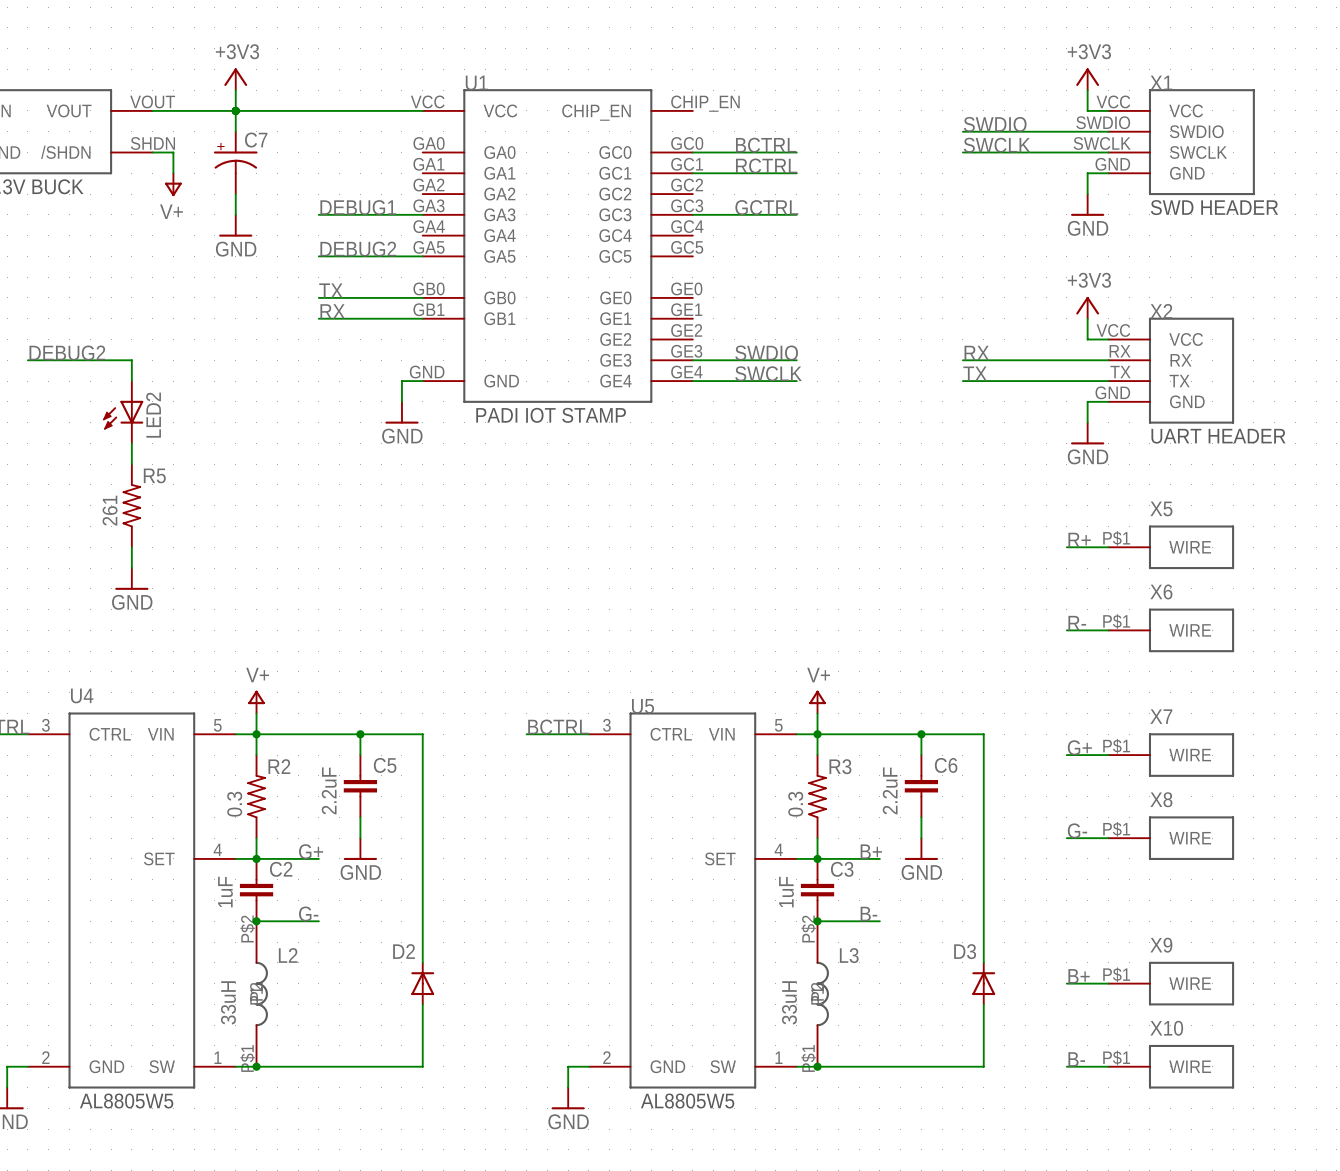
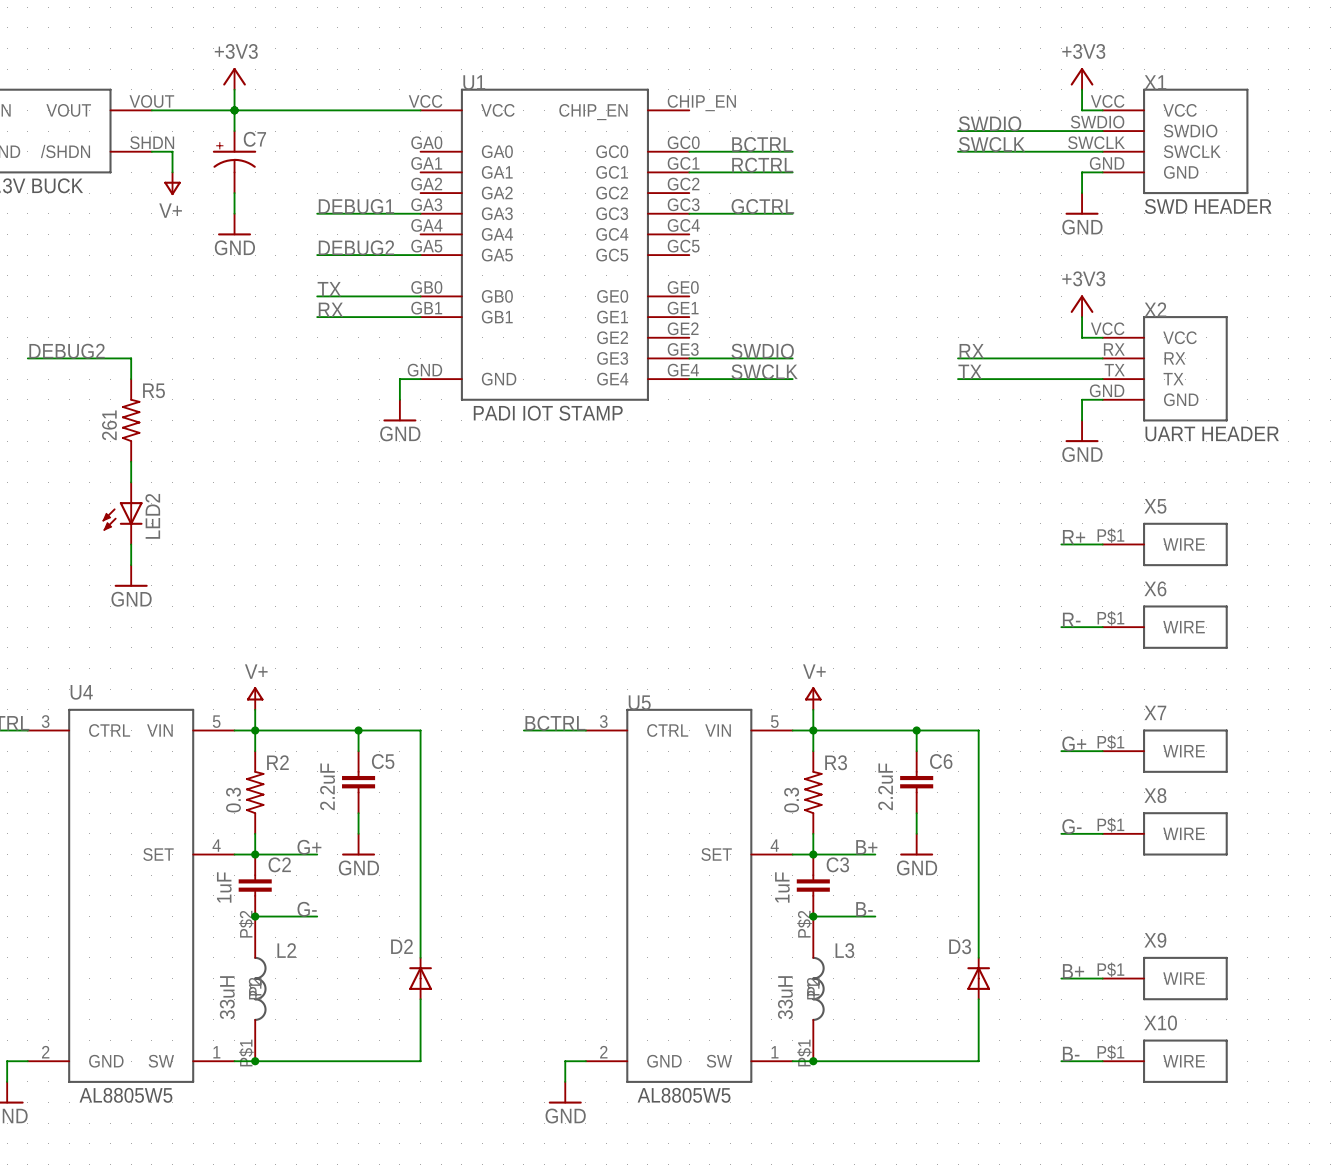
LED2 position: (123, 412) -> (122, 513)
R5 position: (131, 505) -> (131, 420)

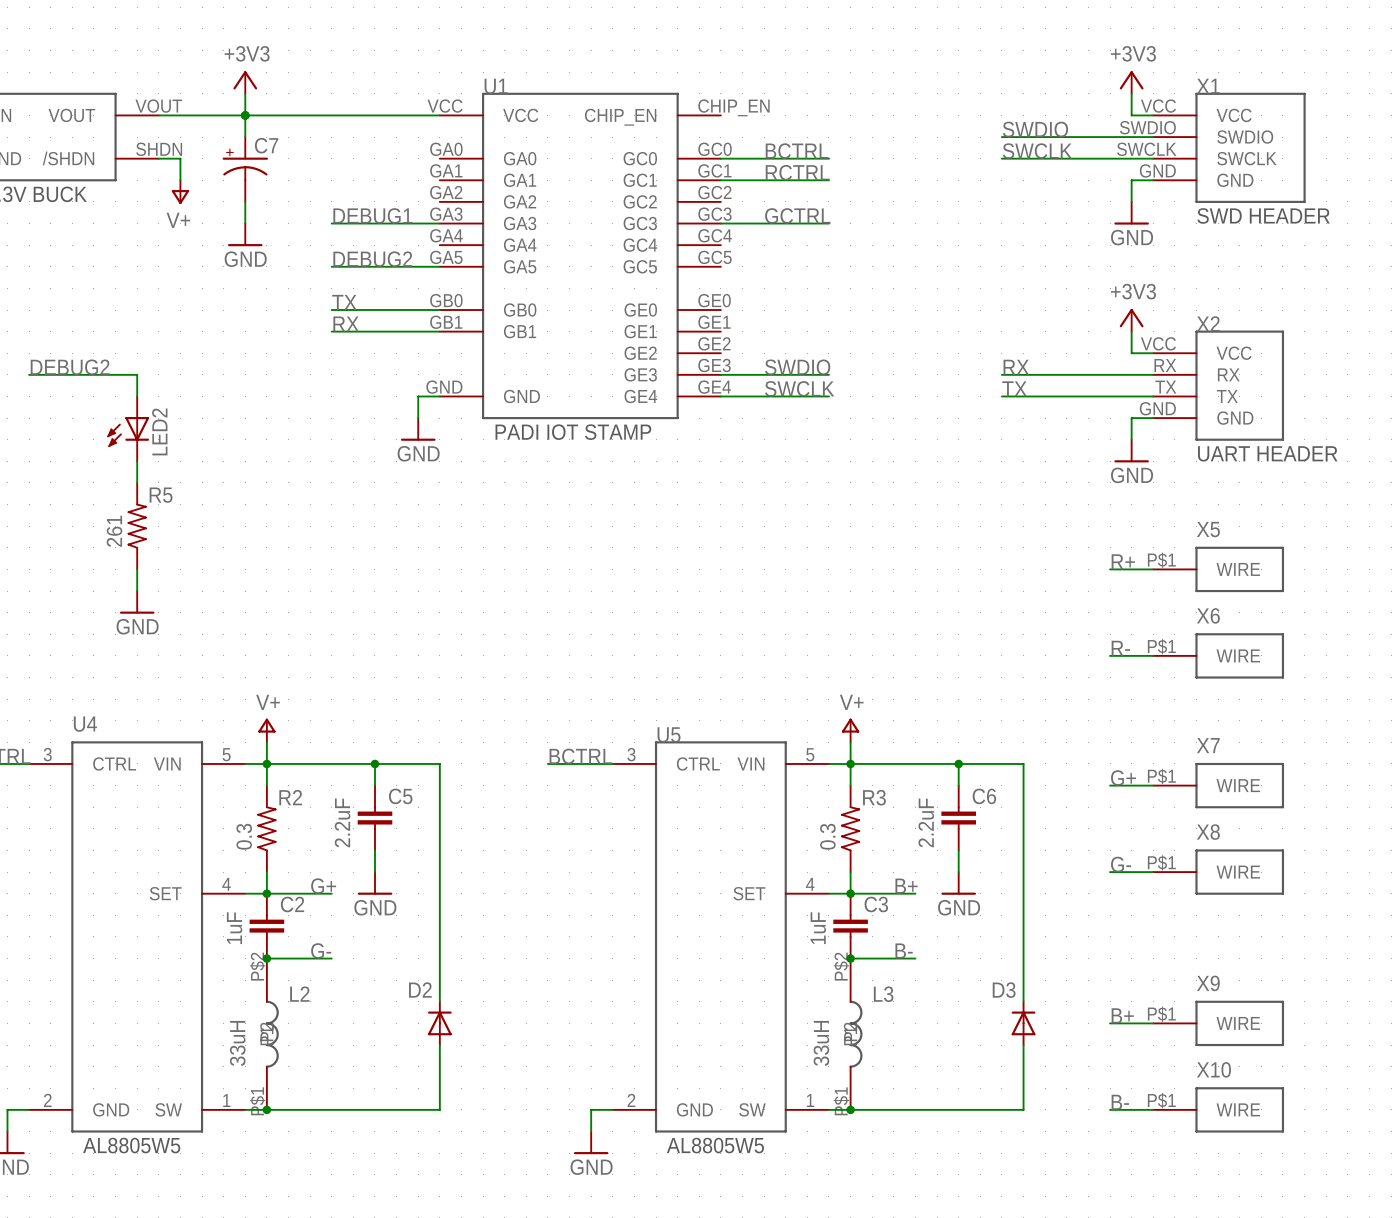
R5 position: (131, 420) -> (137, 526)
LED2 position: (122, 513) -> (128, 428)

